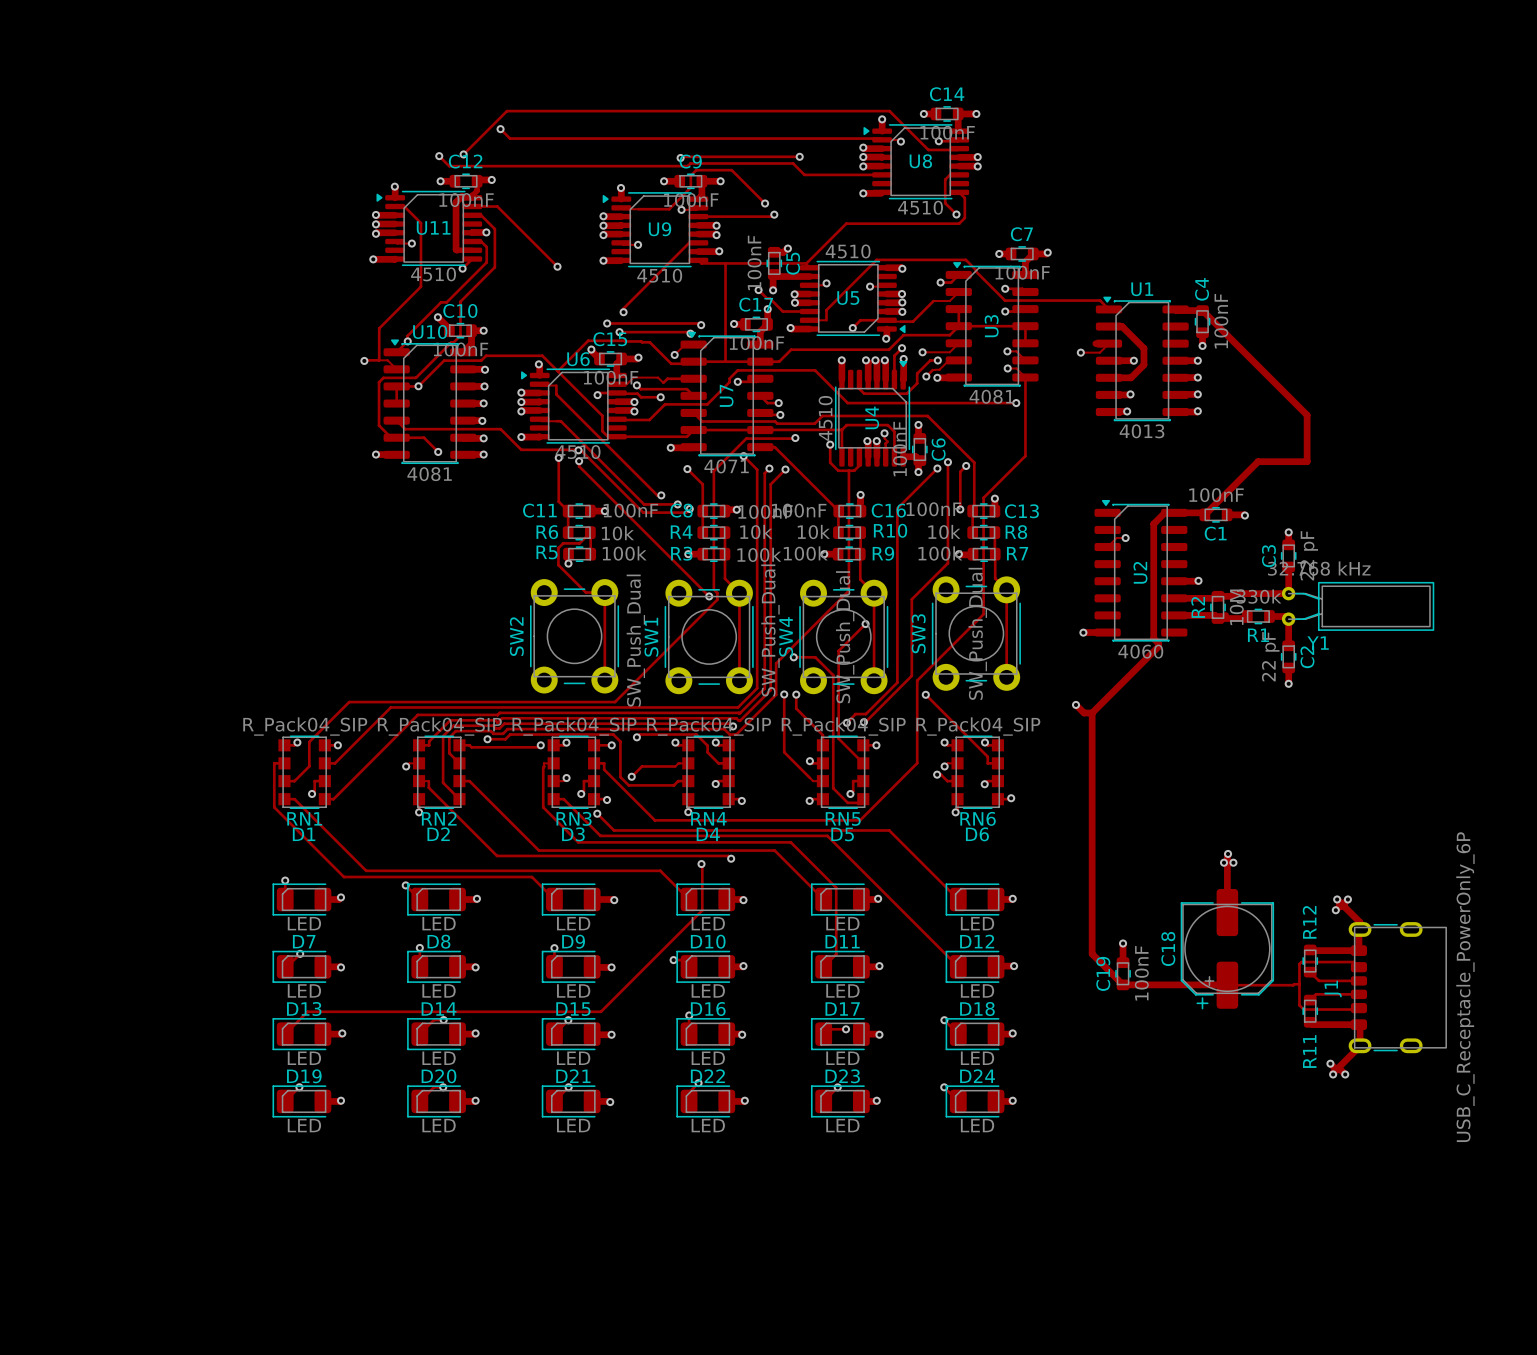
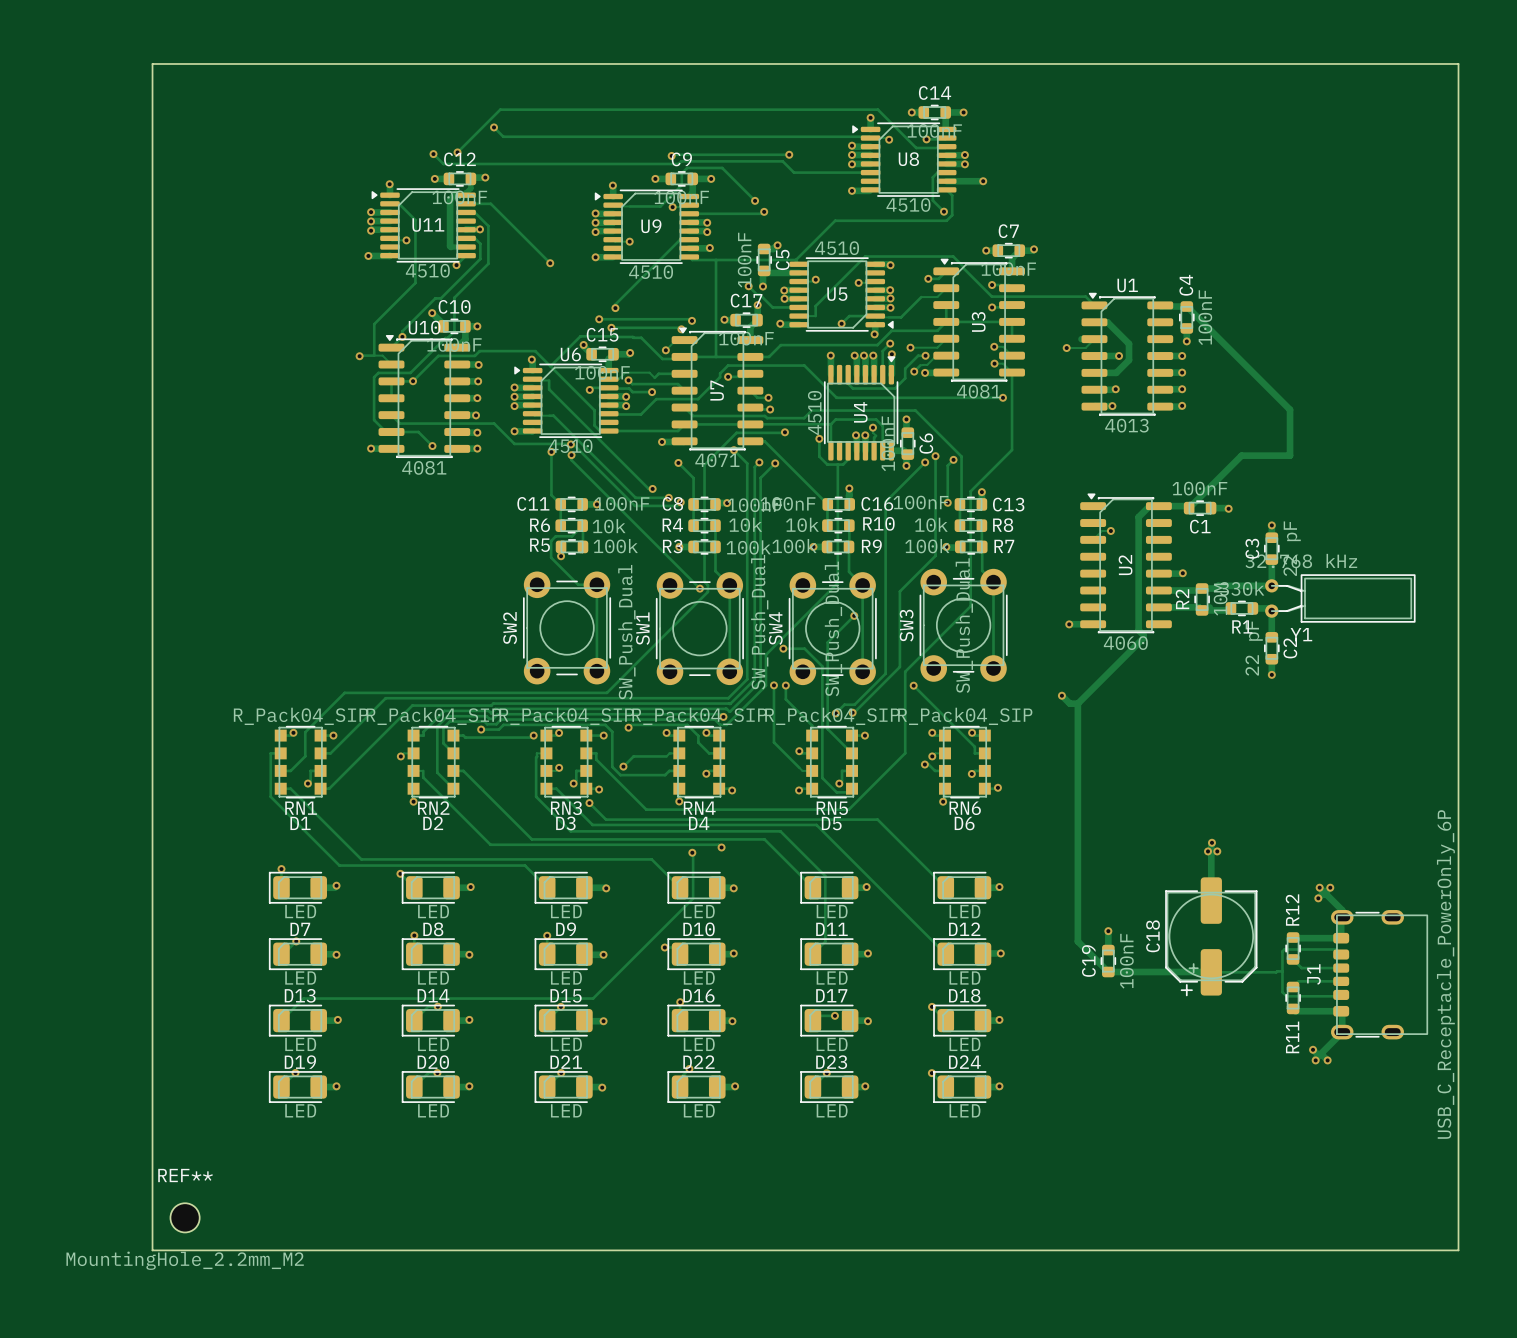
board edge: none -> (152, 63) (1458, 63) (1458, 1250) (152, 1250) (152, 63)
track: none -> (946, 181) (983, 181)
via: none -> (983, 181)
REF**: none -> MountingHole_2.2mm_M2 (185, 1217)

